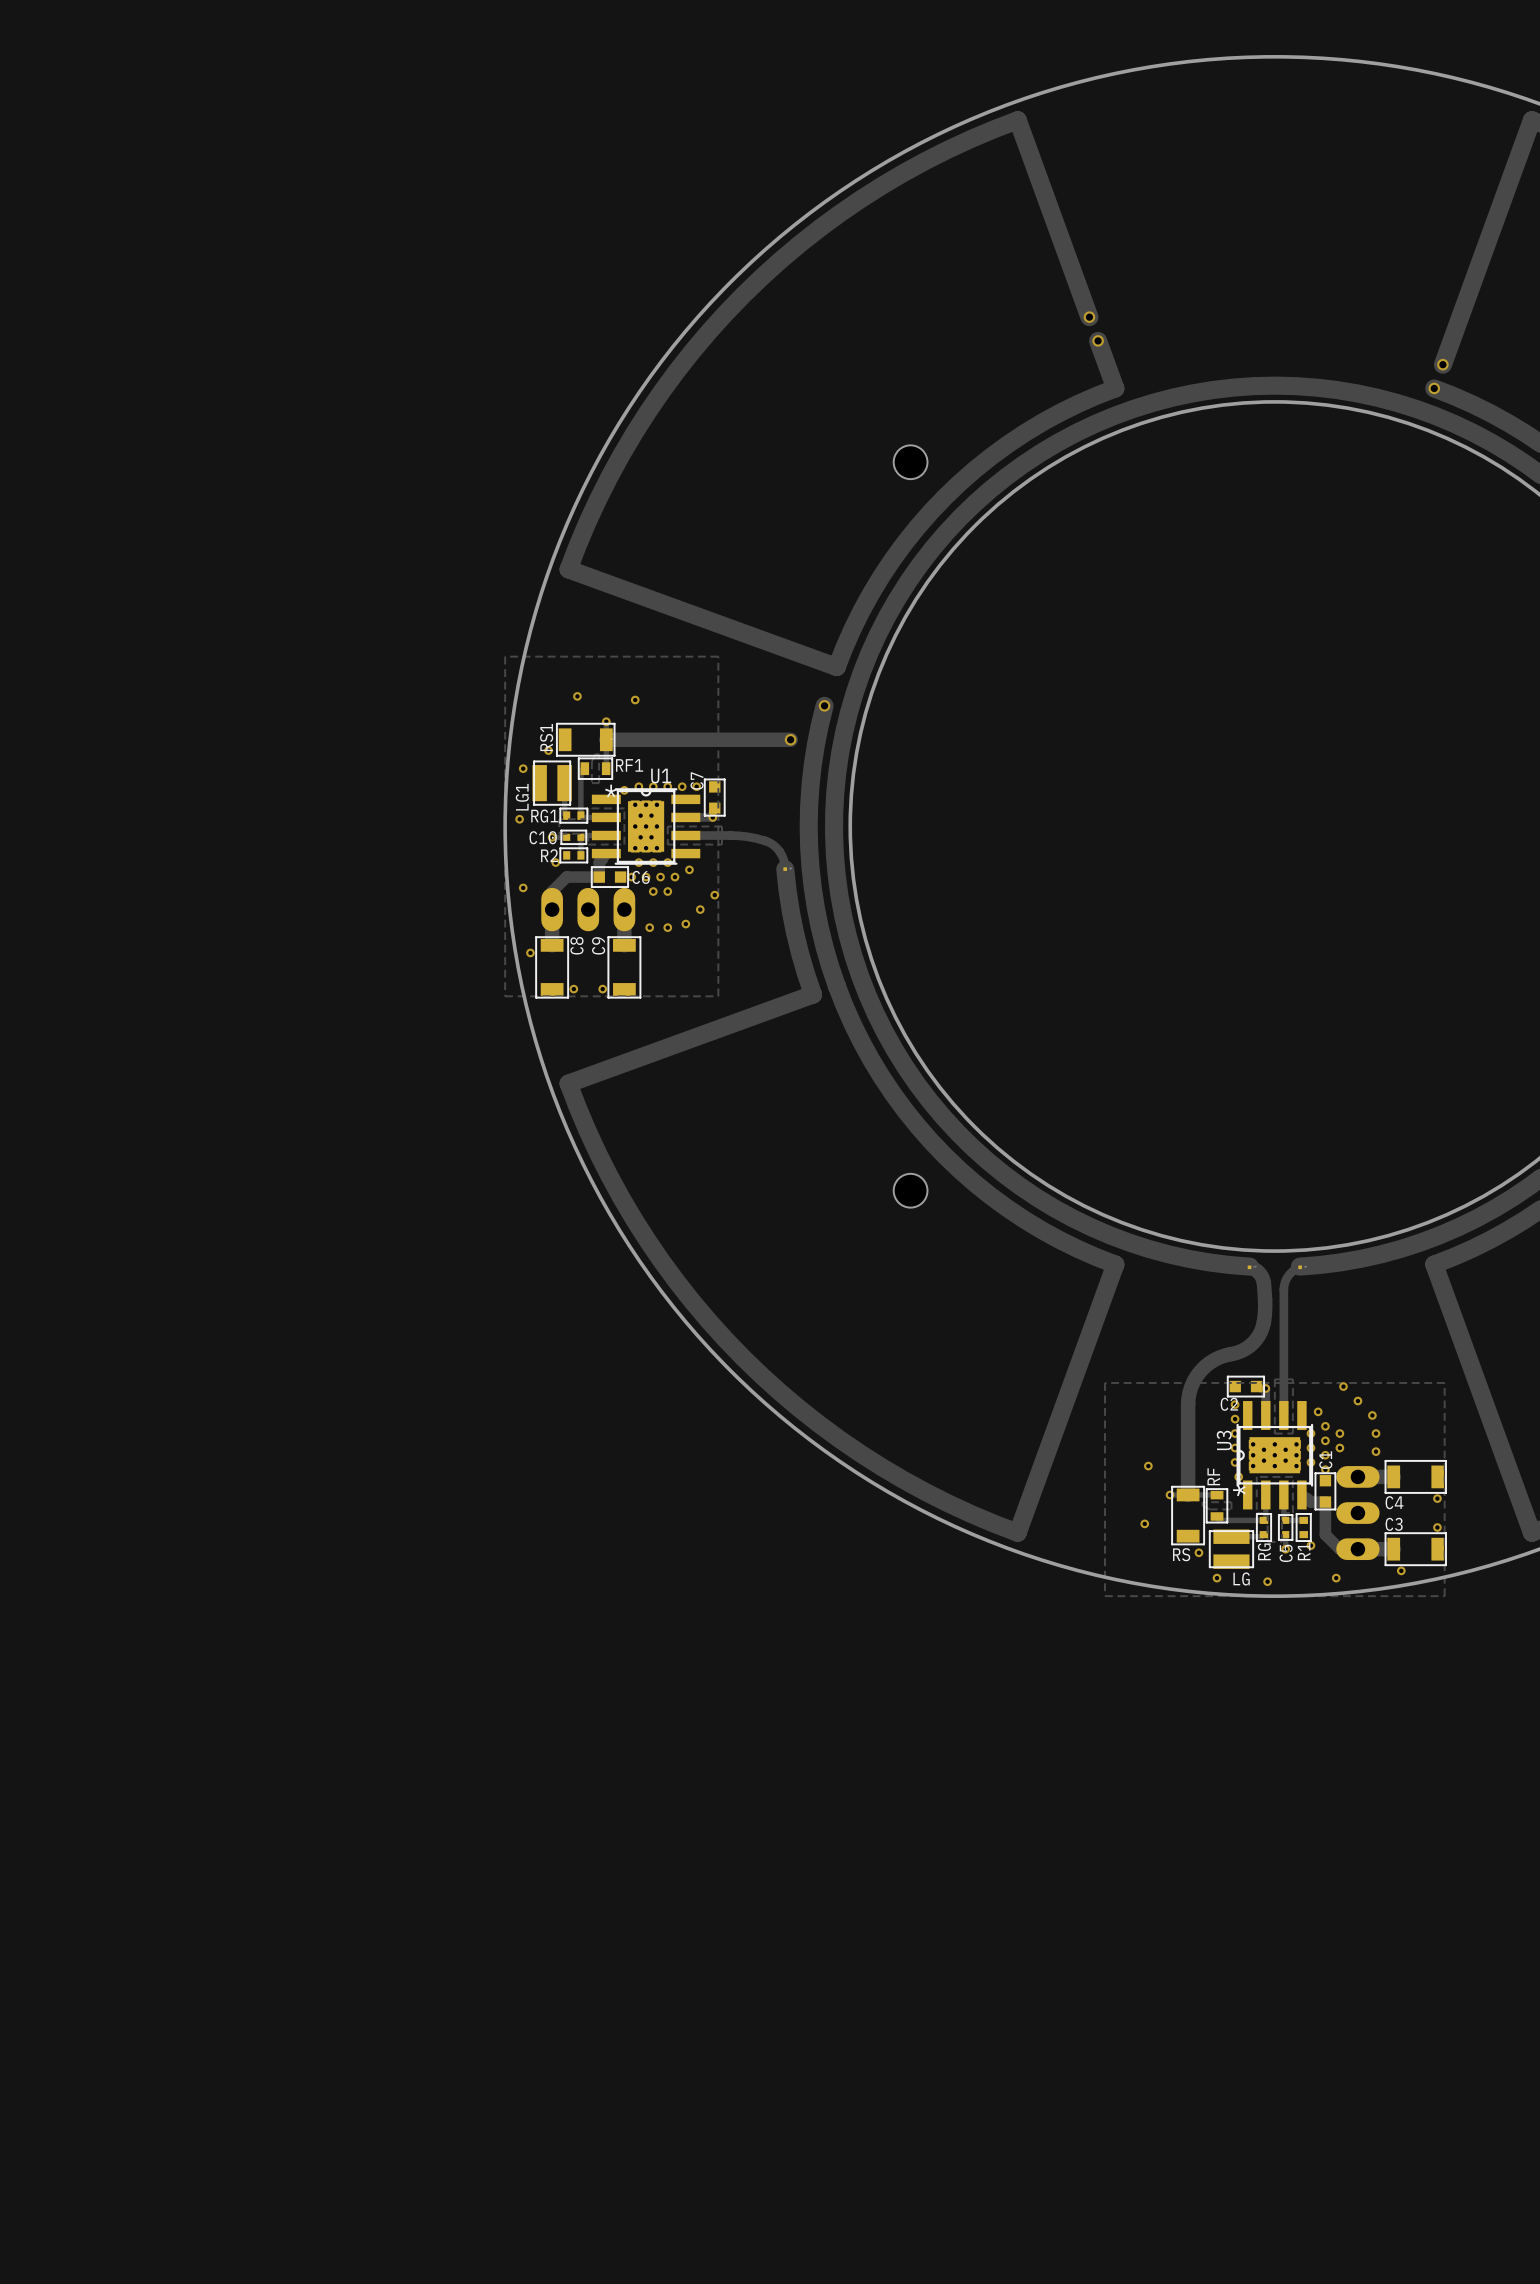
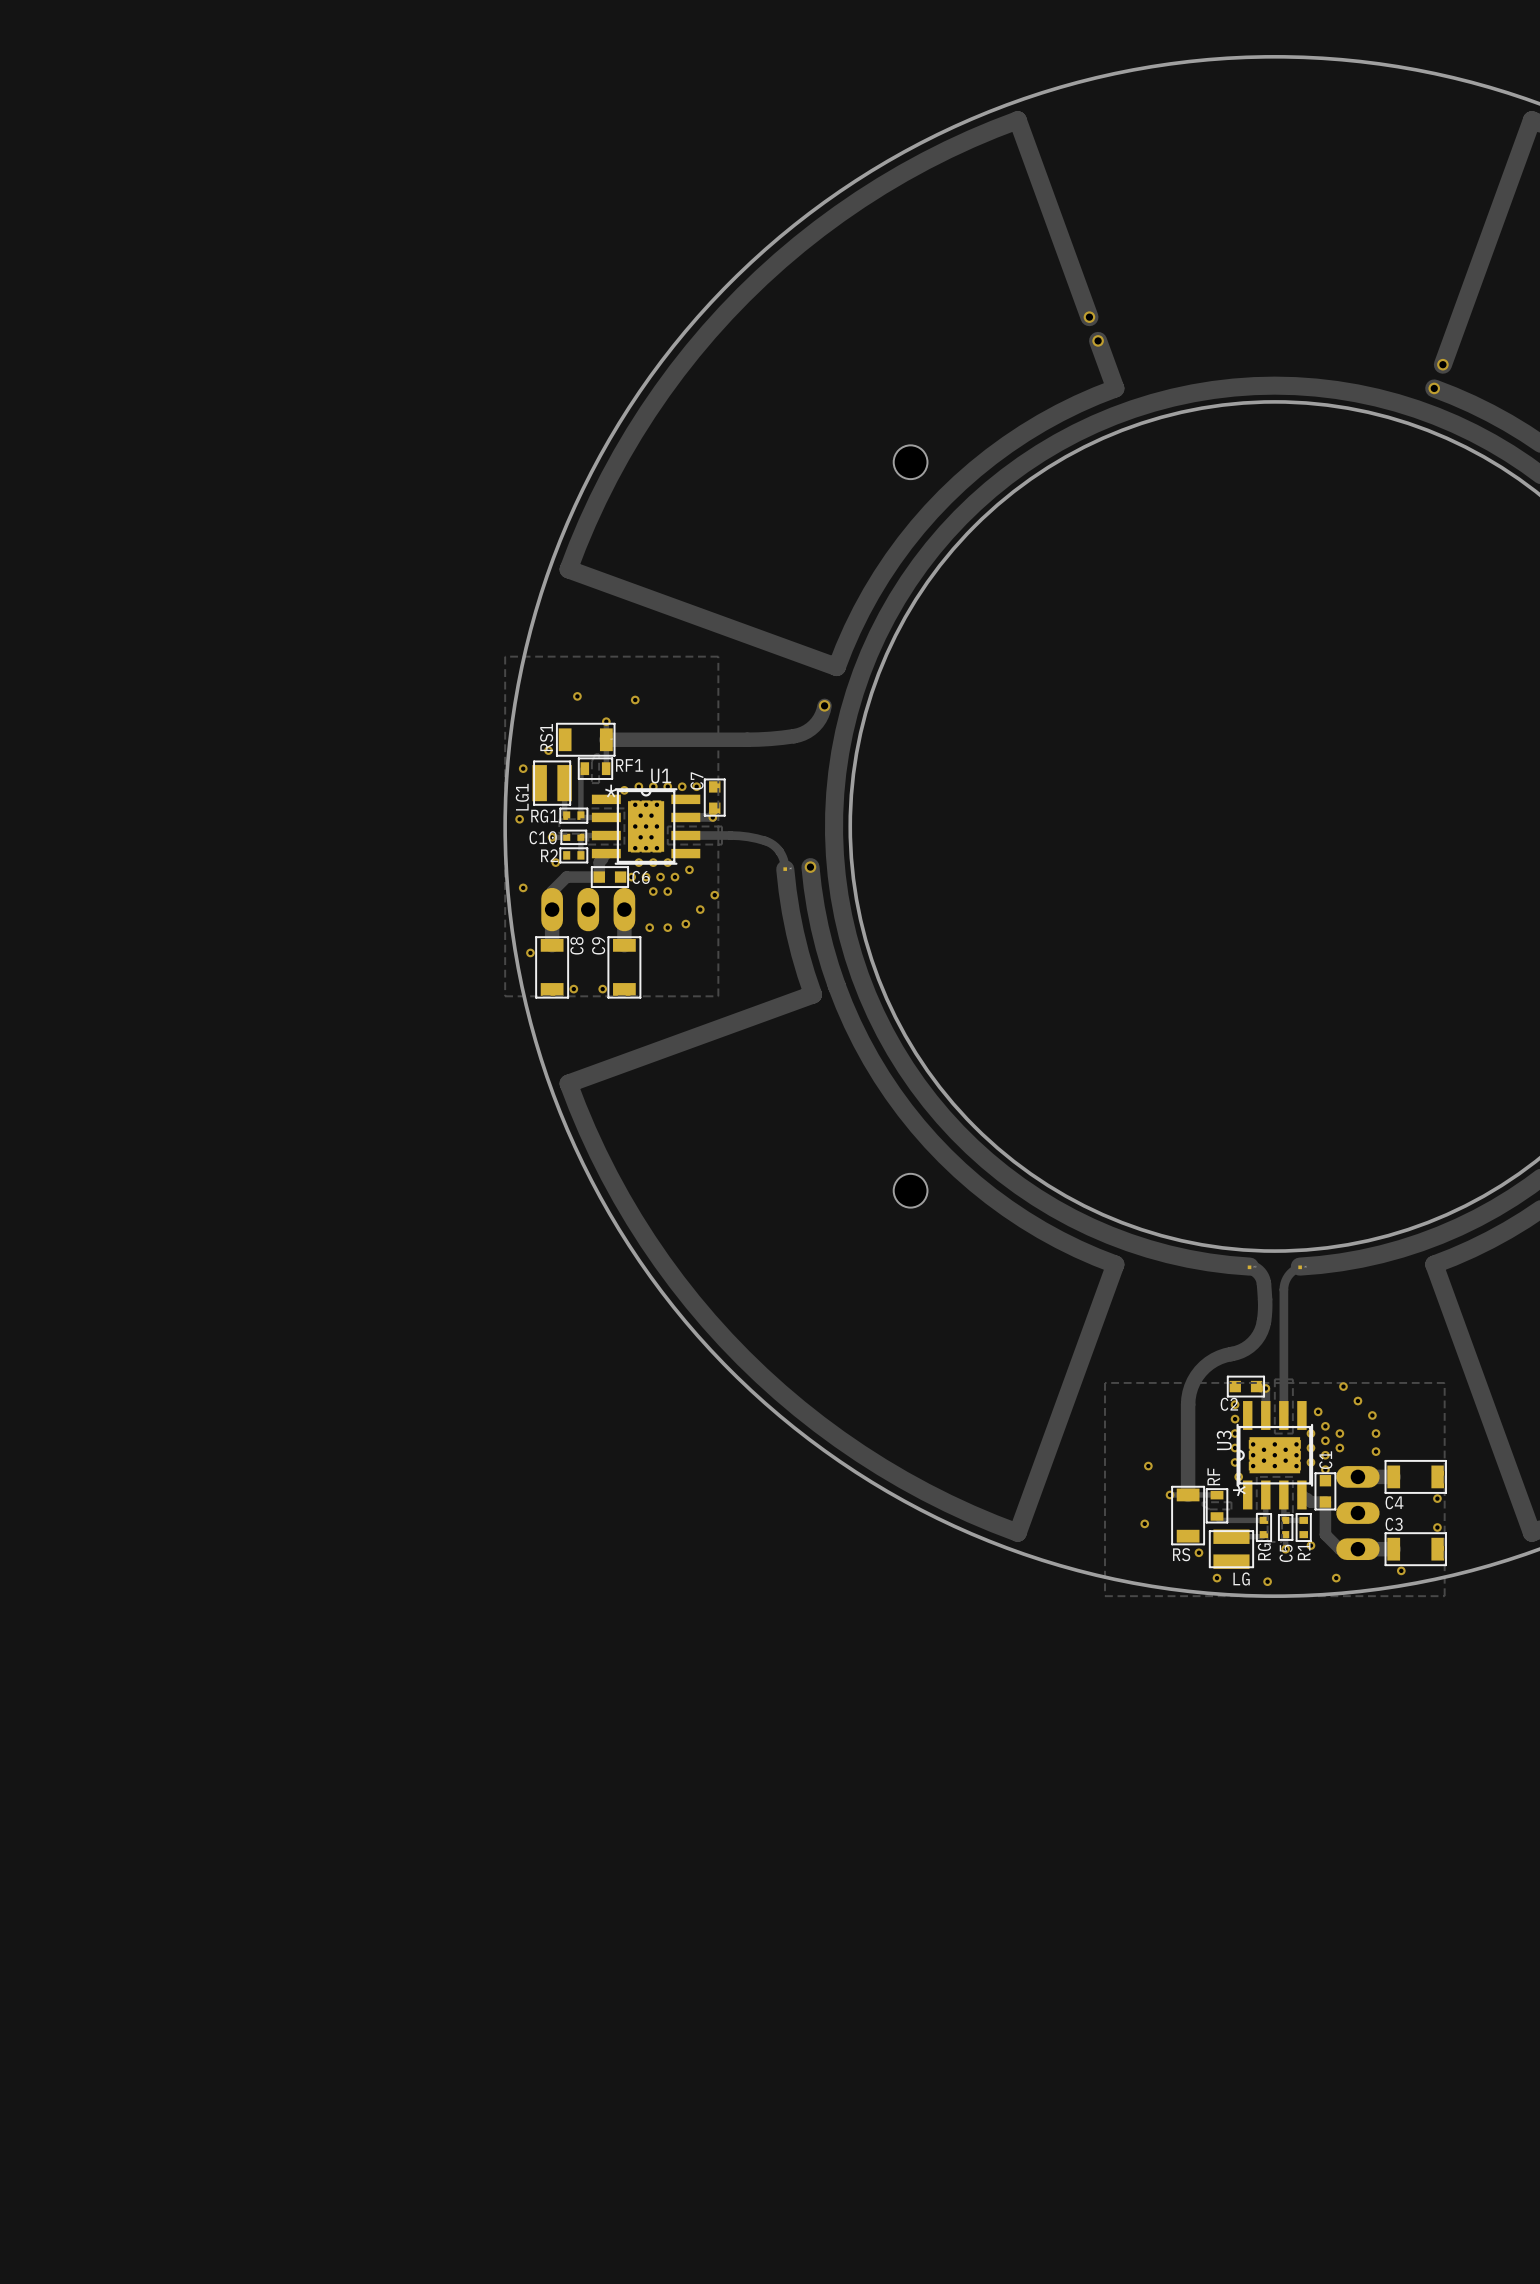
track: (824, 705) (812, 765) (809, 806) (809, 846) (812, 887) (819, 927) (836, 985) -> (810, 867) (819, 927) (836, 985)
track: (747, 739) (790, 739) -> (747, 739) (782, 737) (803, 733) (817, 722) (824, 705)
via: (790, 739) -> none
via: none -> (810, 867)

